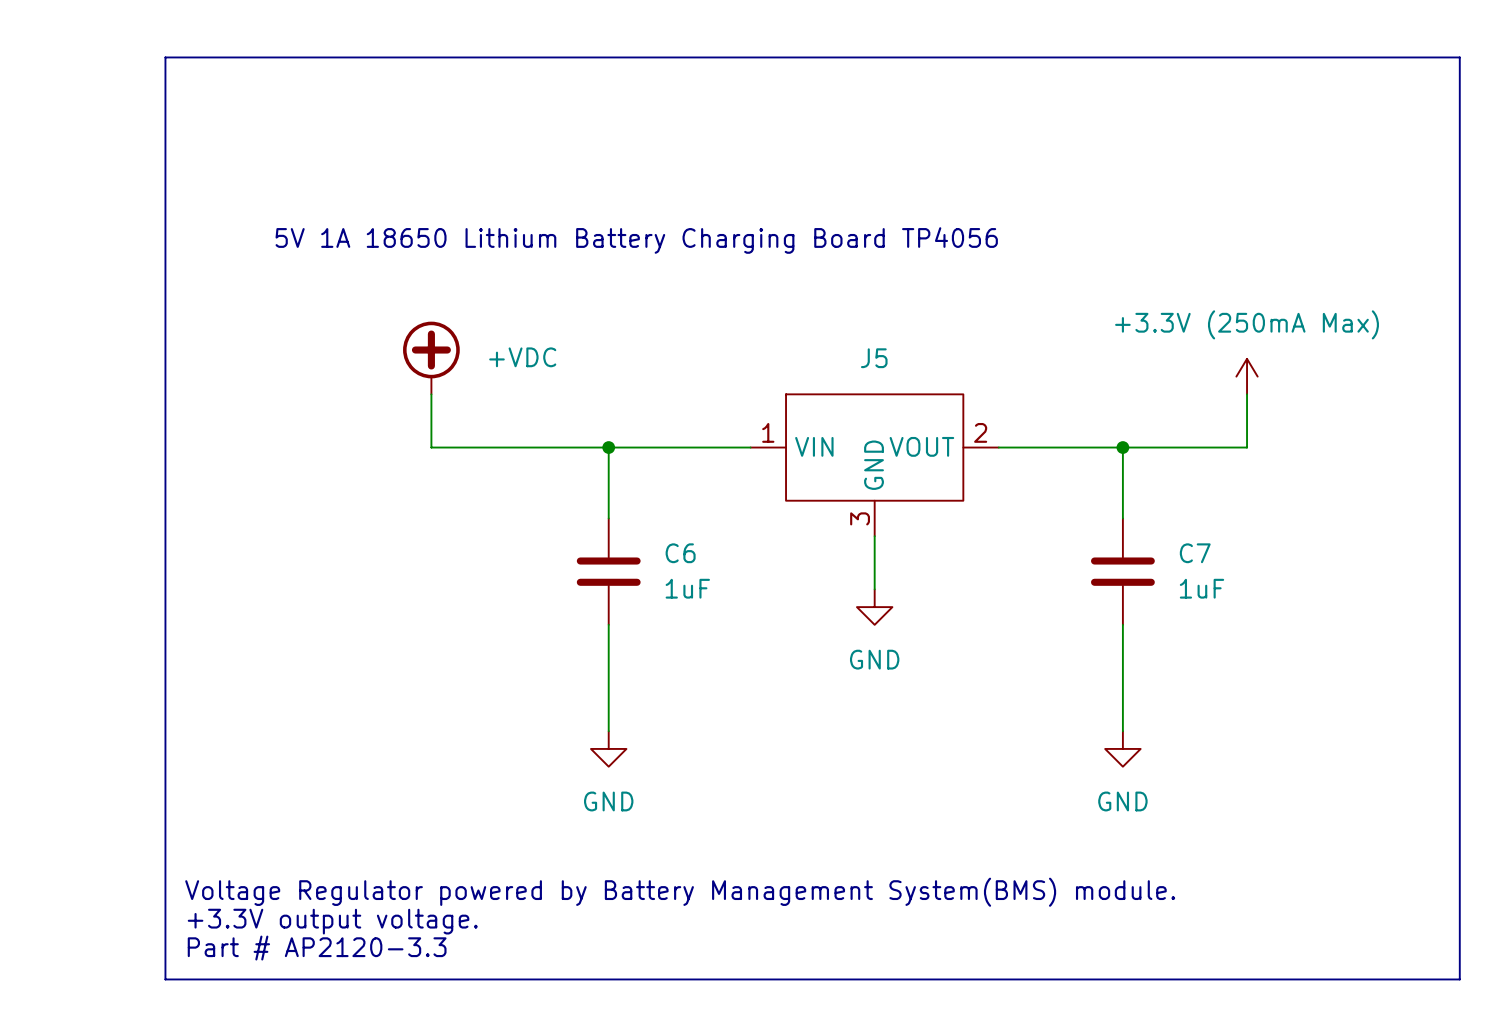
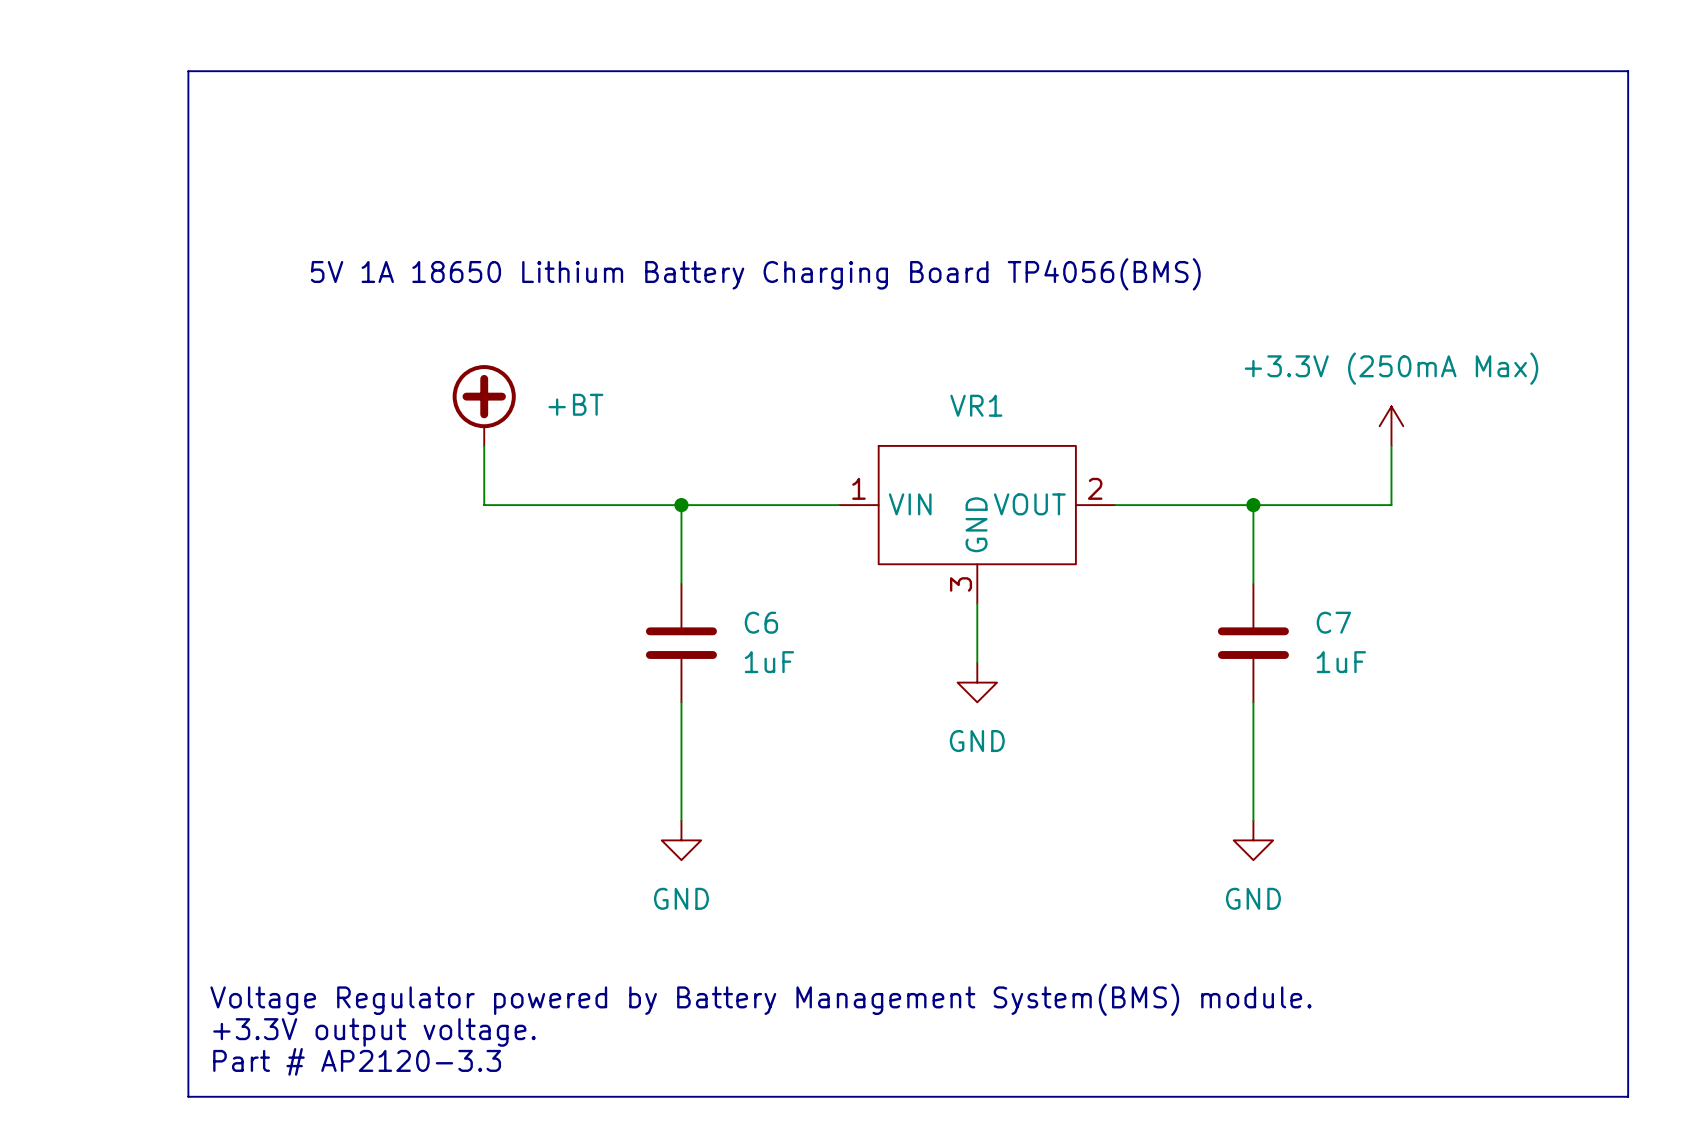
text: 5V 1A 18650 Lithium Battery Charging Board TP4056 (636, 240) -> 5V 1A 18650 Lithium Battery Charging Board TP4056(BMS) (755, 274)
power symbol: +VDC (431, 357) -> +BT (484, 405)
J5 name: J5 (874, 358) -> VR1 (976, 405)

